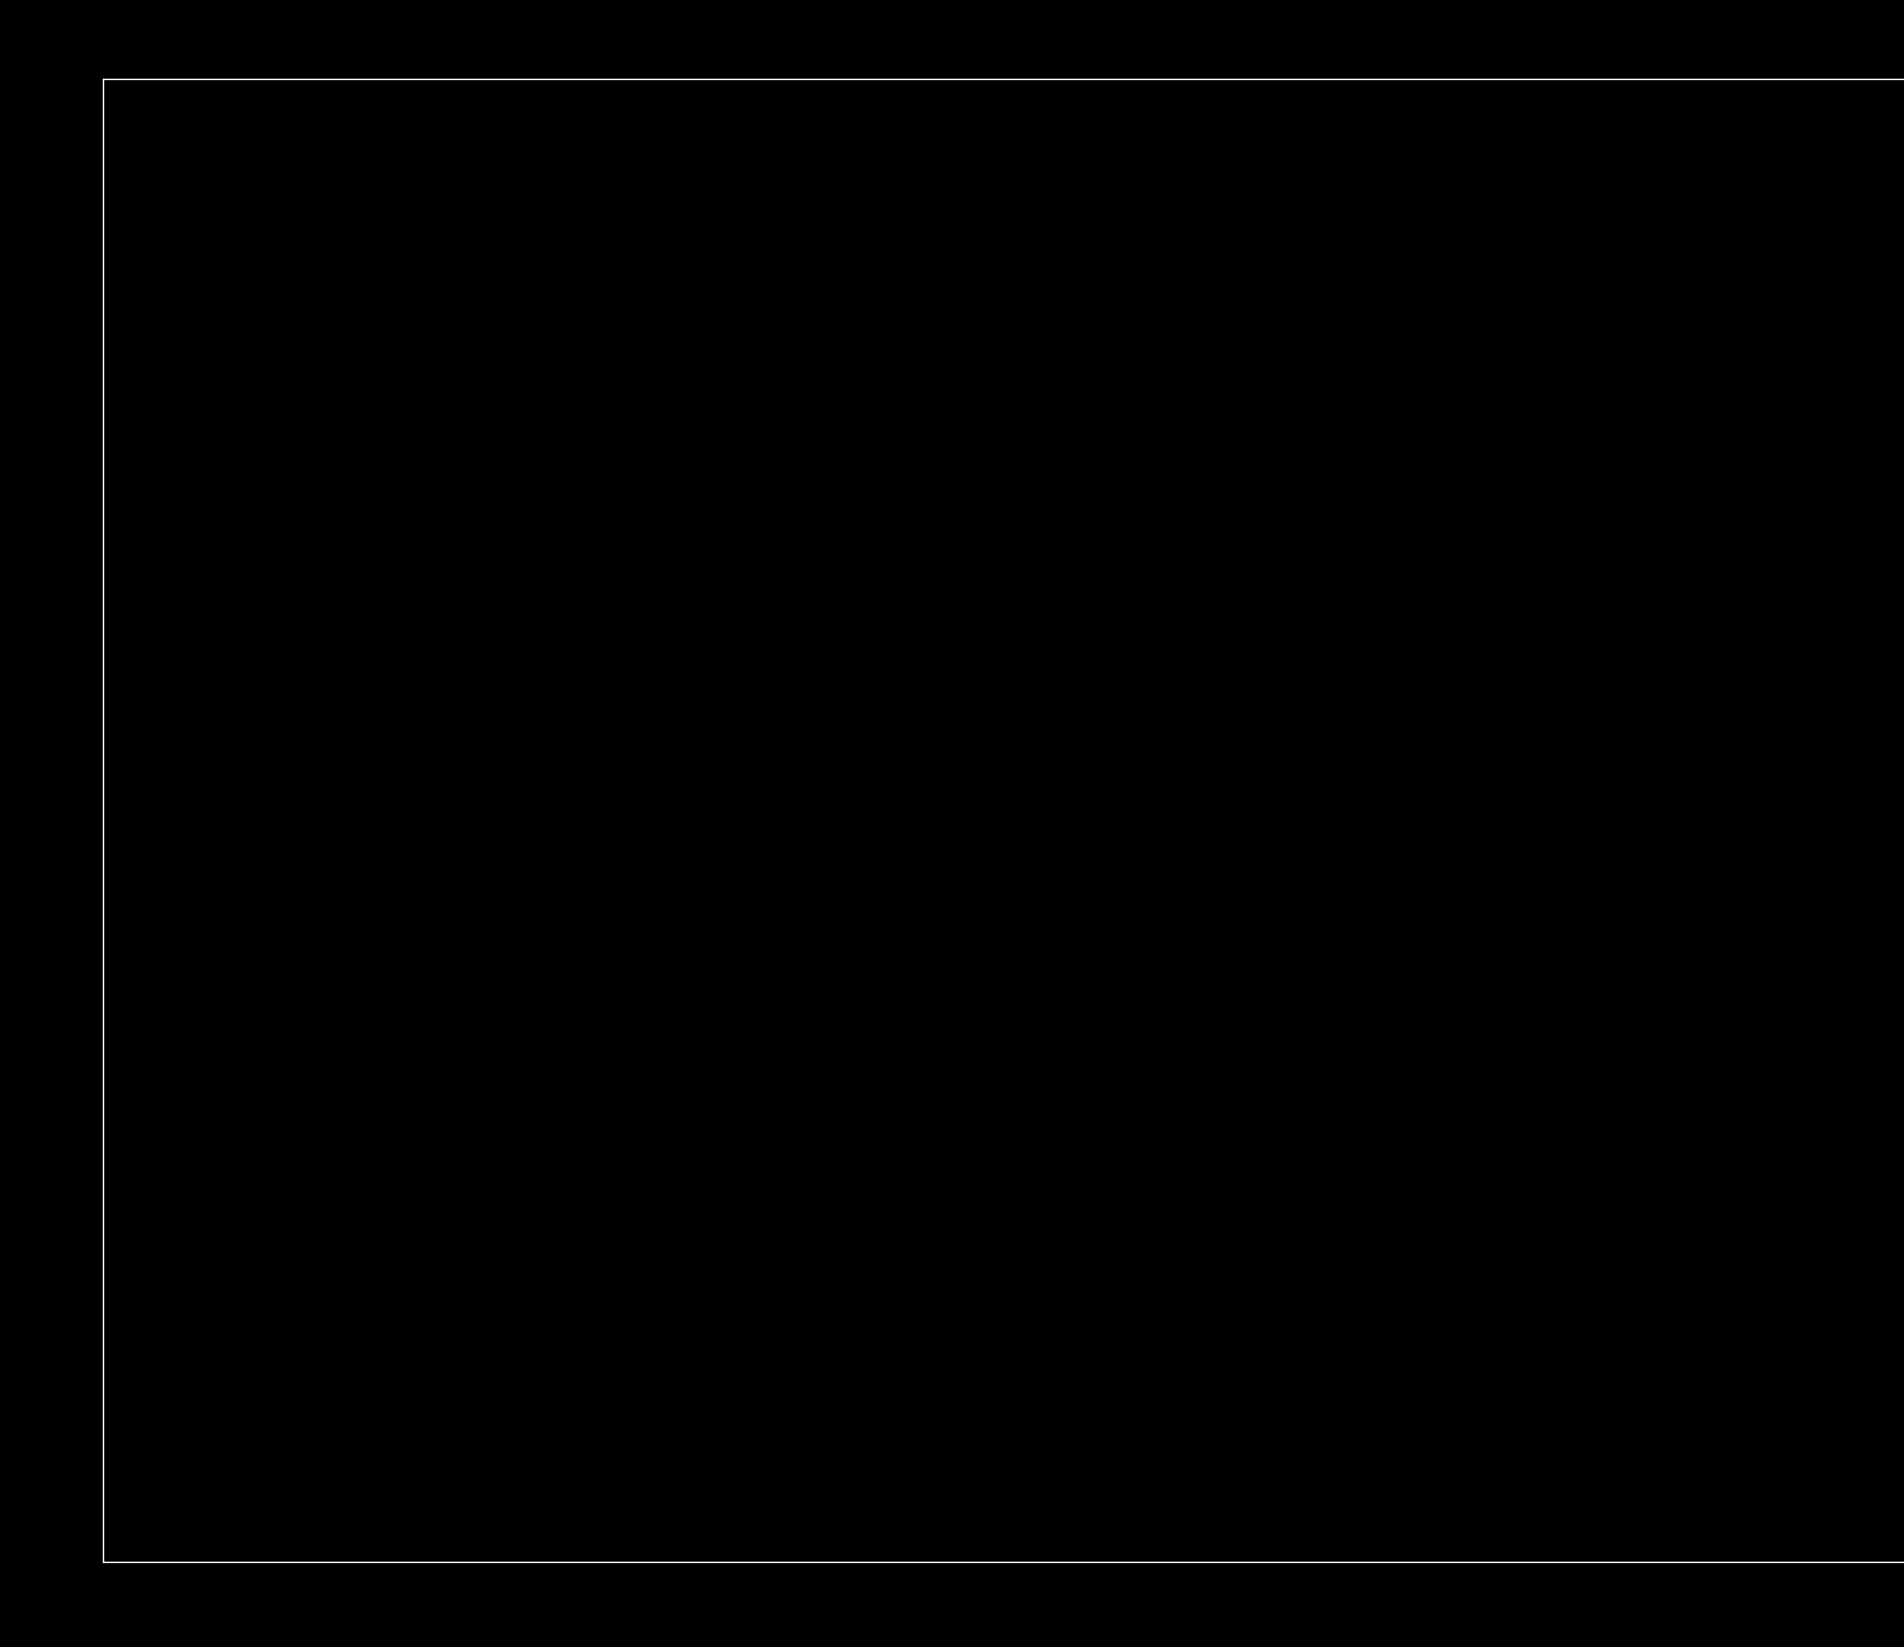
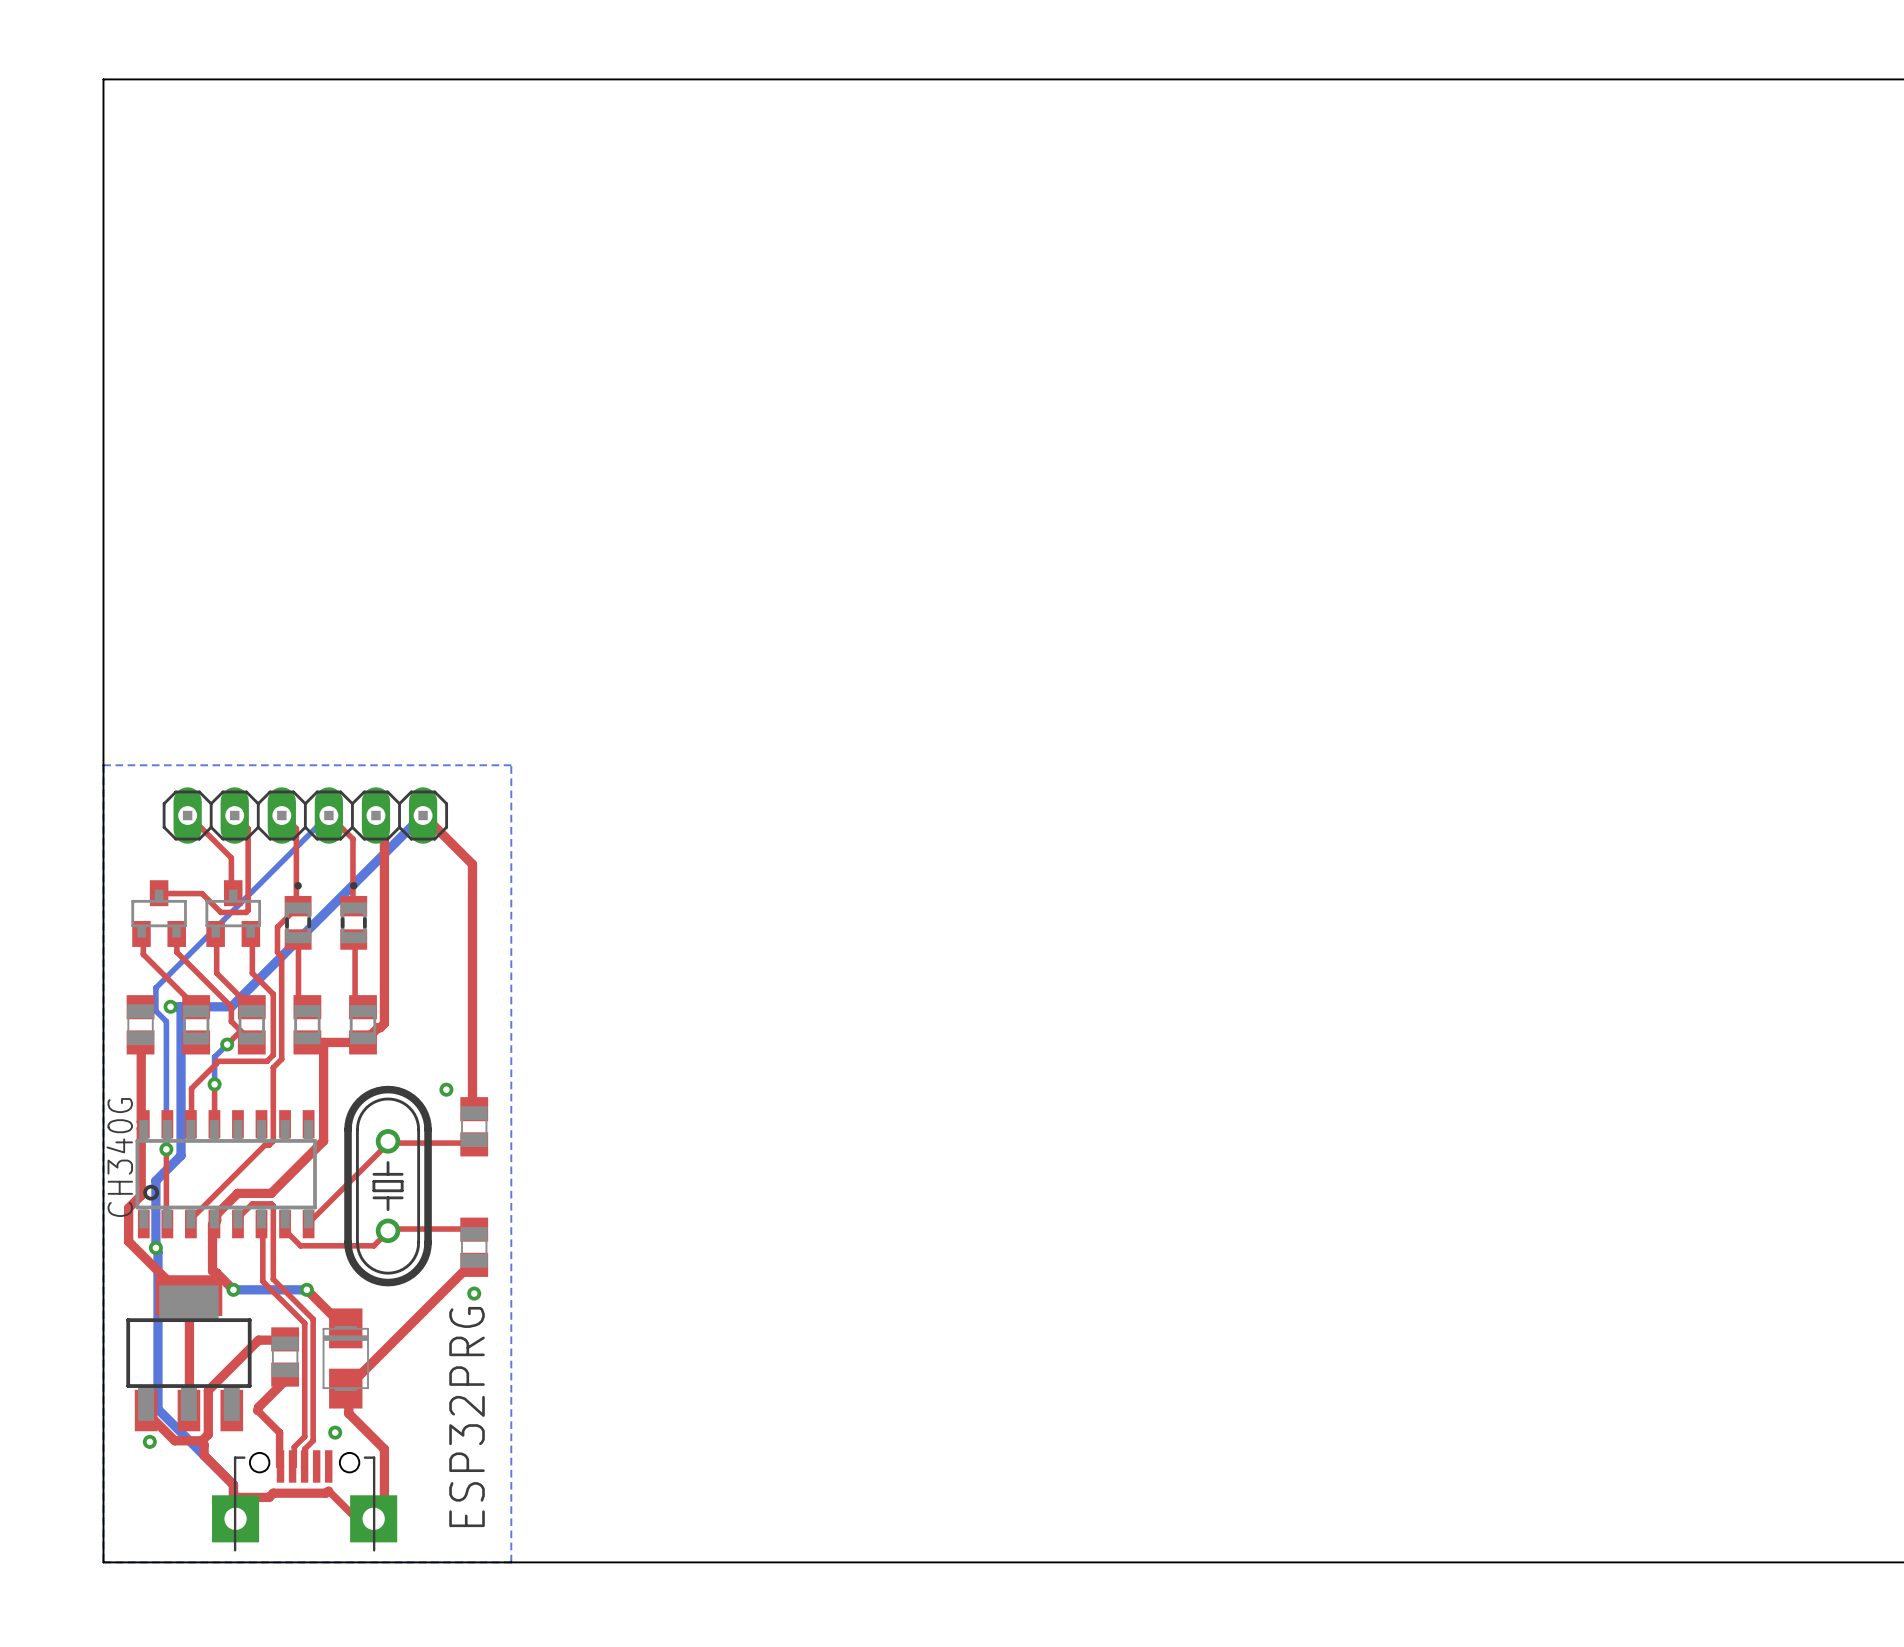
bottom zone outline: none -> (103, 765) (103, 1562) (511, 1562) (511, 765) (103, 765)
top track: none -> (187, 815) (231, 857) (231, 891) (233, 893)
top track: none -> (234, 815) (248, 828) (248, 910) (246, 912) (220, 912) (202, 893) (159, 893)
top track: none -> (281, 815) (296, 828) (296, 906) (298, 906) (277, 927) (277, 952) (281, 956) (281, 1059) (273, 1067) (273, 1140) (269, 1145) (264, 1145) (191, 1218) (190, 1224)
part: none -> (305, 815)
top track: none -> (328, 815) (352, 839) (353, 906)
bottom track: none -> (328, 815) (155, 987) (155, 1010) (166, 1021) (166, 1149)
top track: none -> (375, 815) (384, 824) (384, 1023) (363, 1042) (307, 1042)
top track: none -> (423, 815) (472, 864) (472, 1107) (474, 1109)
bottom track: none -> (423, 815) (231, 1006) (170, 1006)
part: none -> (159, 913)
part: none -> (233, 913)
part: none -> (298, 915)
part: none -> (353, 915)
top track: none -> (141, 933) (143, 935) (143, 954) (196, 1007)
top track: none -> (176, 933) (176, 952) (231, 1006) (231, 1021) (251, 1042) (239, 1031) (227, 1044)
top track: none -> (215, 933) (216, 973) (251, 1007)
top track: none -> (250, 933) (252, 973) (273, 994) (273, 1055) (267, 1061) (216, 1061) (191, 1088) (190, 1124)
top track: none -> (298, 939) (298, 998) (307, 1007)
top track: none -> (353, 939) (355, 1000) (363, 1007)
via: none -> (170, 1006)
bottom track: none -> (181, 1006) (181, 1155) (155, 1180) (157, 1409) (233, 1484) (233, 1518) (235, 1518)
part: none -> (140, 1024)
part: none -> (196, 1024)
part: none -> (251, 1024)
part: none -> (307, 1024)
part: none -> (363, 1024)
top track: none -> (140, 1042) (141, 1122) (143, 1124) (141, 1128) (141, 1195) (128, 1208) (128, 1241) (178, 1291) (185, 1291) (188, 1295) (188, 1410)
top track: none -> (323, 1042) (323, 1140) (271, 1193) (237, 1193) (216, 1214) (216, 1220) (212, 1224) (212, 1270) (233, 1289)
bottom track: none -> (227, 1044) (214, 1057) (214, 1084)
via: none -> (227, 1044)
top track: none -> (214, 1084) (214, 1124)
via: none -> (214, 1084)
via: none -> (446, 1089)
part: none -> (474, 1126)
top track: none -> (388, 1143) (474, 1144)
top track: none -> (388, 1143) (308, 1224)
top track: none -> (166, 1149) (167, 1224)
via: none -> (166, 1149)
part: none -> (226, 1174)
part: none -> (388, 1186)
top track: none -> (237, 1224) (239, 1216) (252, 1203) (271, 1203) (273, 1205) (273, 1279) (313, 1319) (313, 1440) (304, 1449) (304, 1466)
top track: none -> (261, 1224) (262, 1281) (304, 1323) (304, 1436) (294, 1447) (294, 1465) (292, 1466)
top track: none -> (285, 1224) (285, 1231) (300, 1245) (373, 1245) (388, 1229) (474, 1229)
via: none -> (155, 1247)
part: none -> (474, 1247)
top track: none -> (474, 1264) (468, 1266) (345, 1388) (348, 1392) (348, 1413) (384, 1449) (384, 1507) (373, 1518) (356, 1518) (328, 1491) (325, 1493) (273, 1493) (269, 1497) (237, 1497) (235, 1518) (233, 1518) (233, 1484) (204, 1455) (202, 1440)
bottom track: none -> (233, 1289) (306, 1289)
via: none -> (233, 1289)
top track: none -> (306, 1289) (345, 1328)
via: none -> (306, 1289)
via: none -> (474, 1293)
top track: none -> (285, 1339) (258, 1340) (208, 1390) (208, 1434) (202, 1440)
part: none -> (188, 1353)
part: none -> (285, 1356)
part: none -> (345, 1358)
top track: none -> (285, 1374) (283, 1382) (257, 1410) (279, 1432) (280, 1466)
top track: none -> (146, 1410) (174, 1440) (202, 1440)
via: none -> (335, 1432)
text: none -> ESP32PRG (467, 1417)
via: none -> (149, 1441)
part: none -> (304, 1500)

